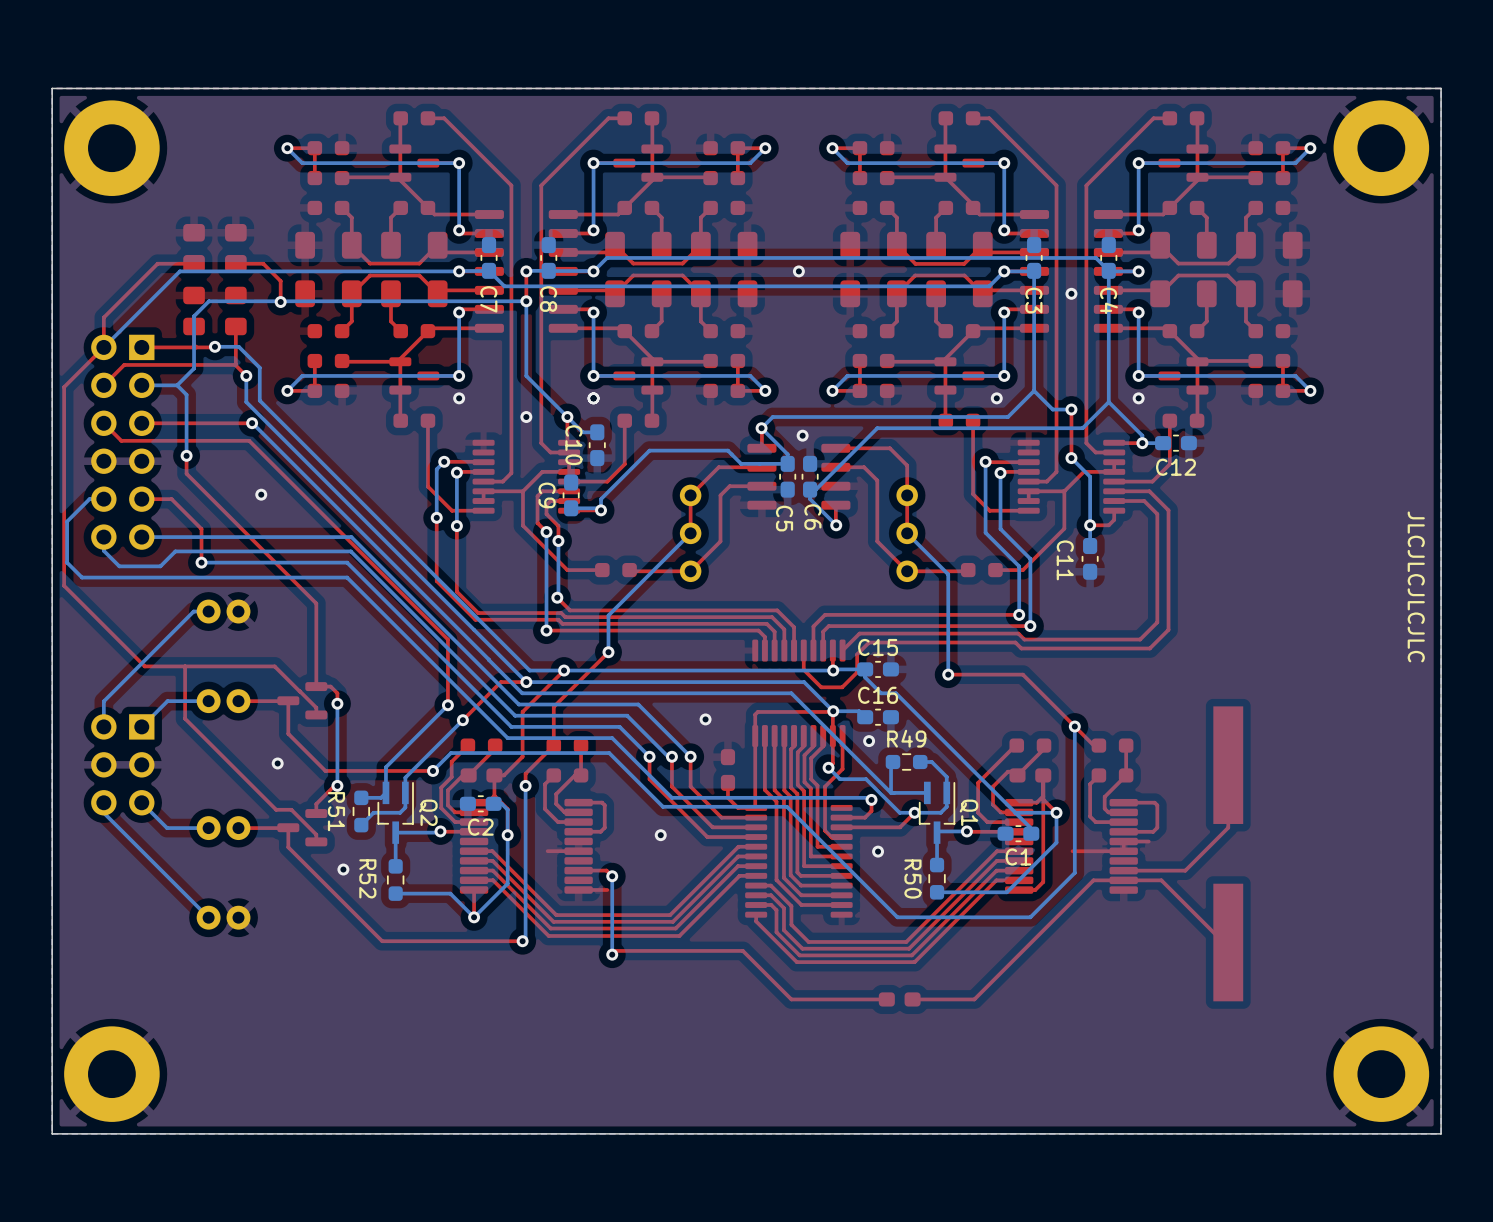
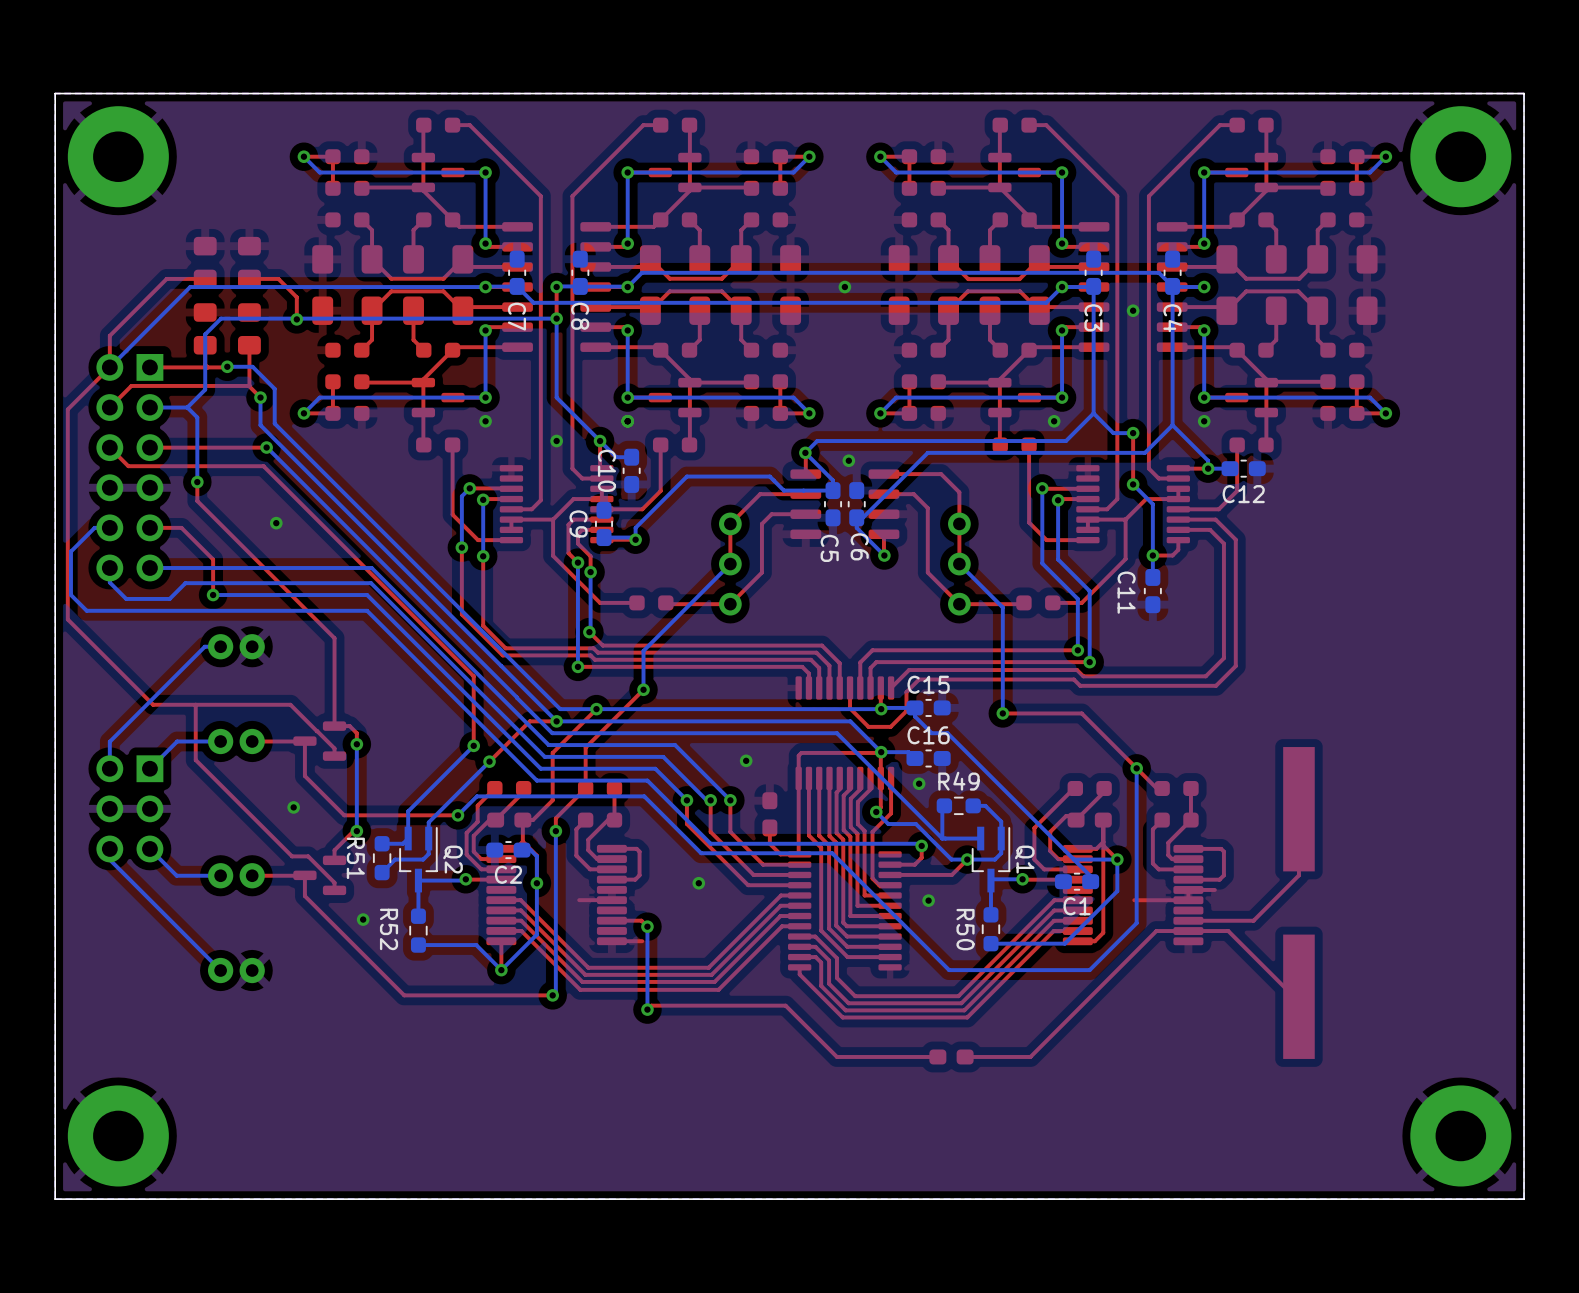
text: JLCJLCJLCJLC (1416, 586) -> none

